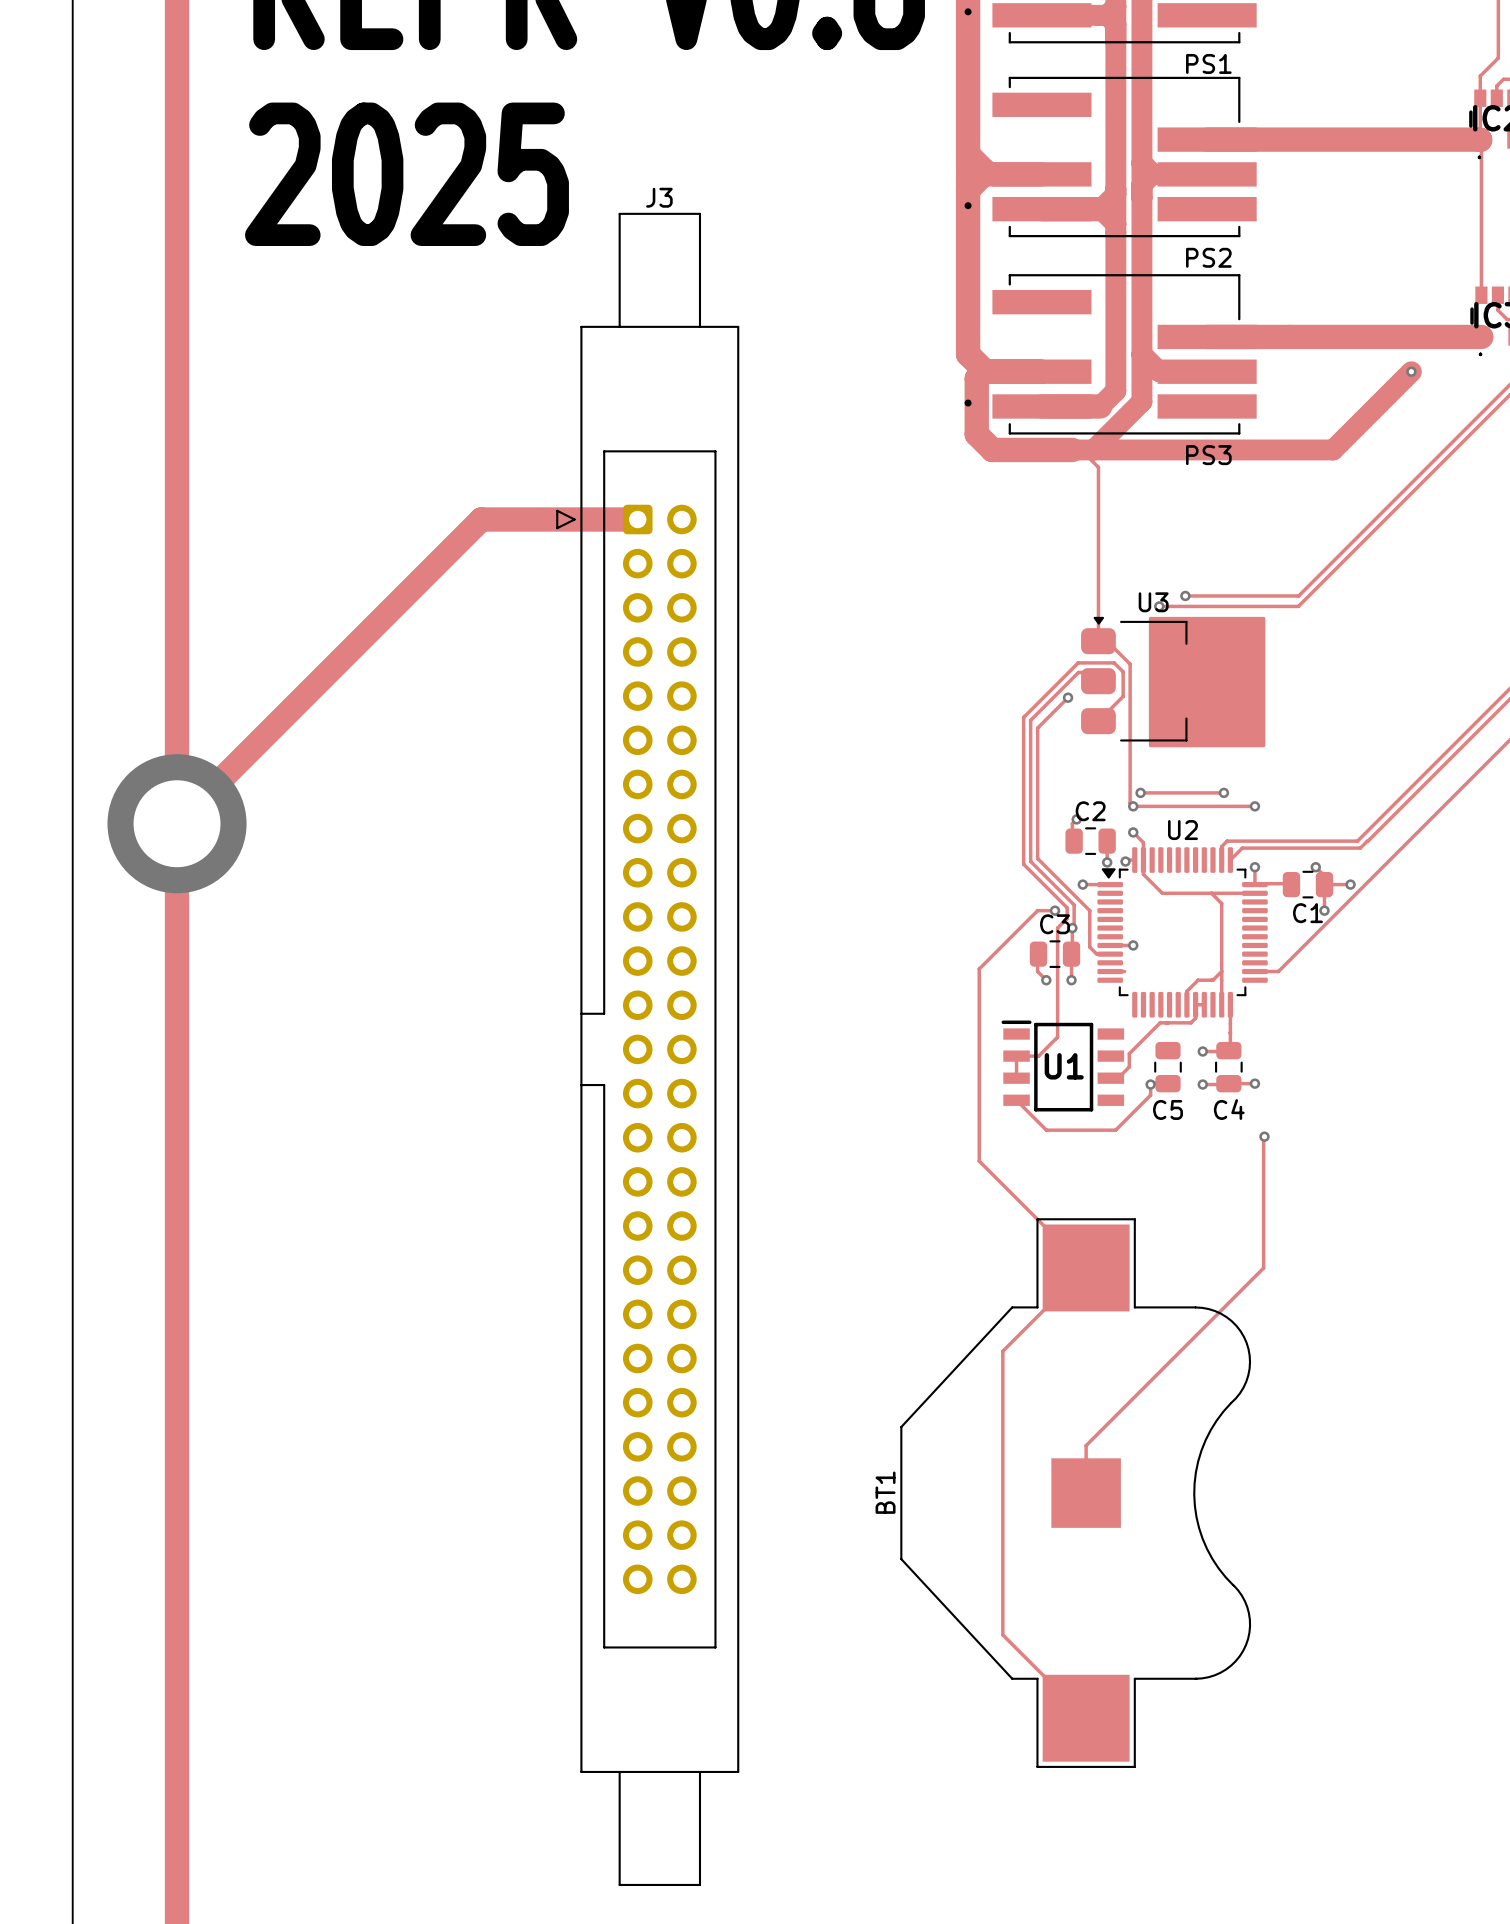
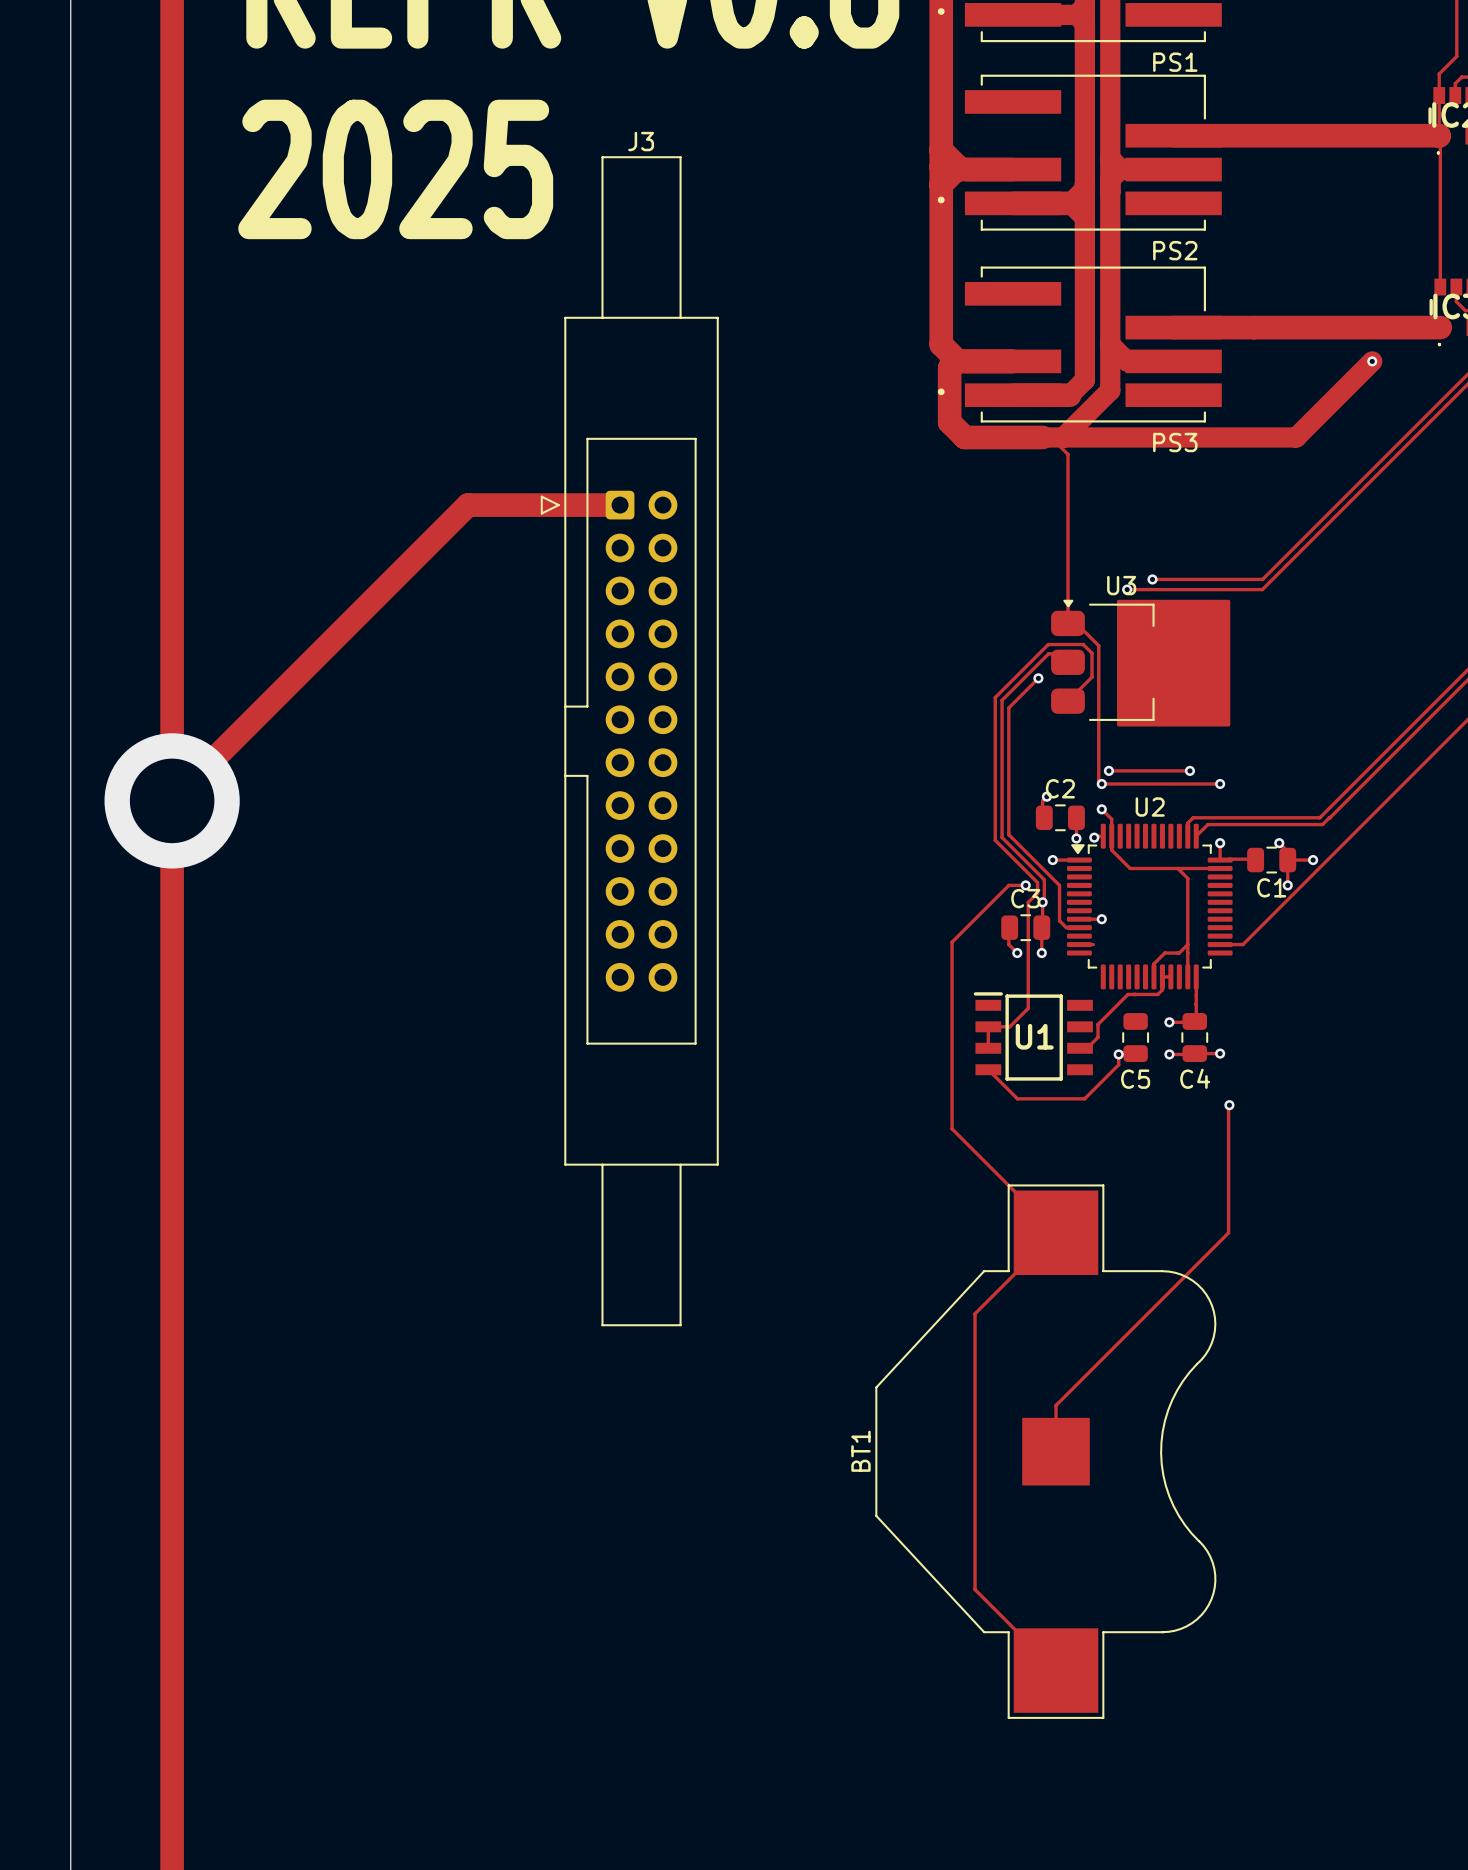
J3 name position: J3 (659, 197) -> J3 (641, 141)
J3 footprint: [556, 212, 740, 1887] -> [540, 156, 719, 1327]

